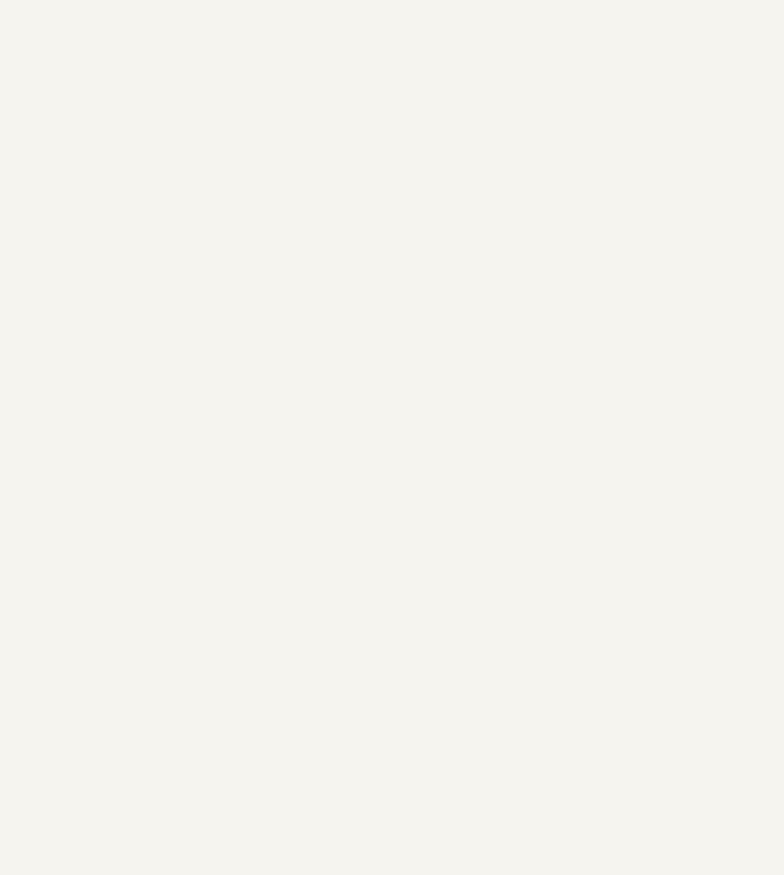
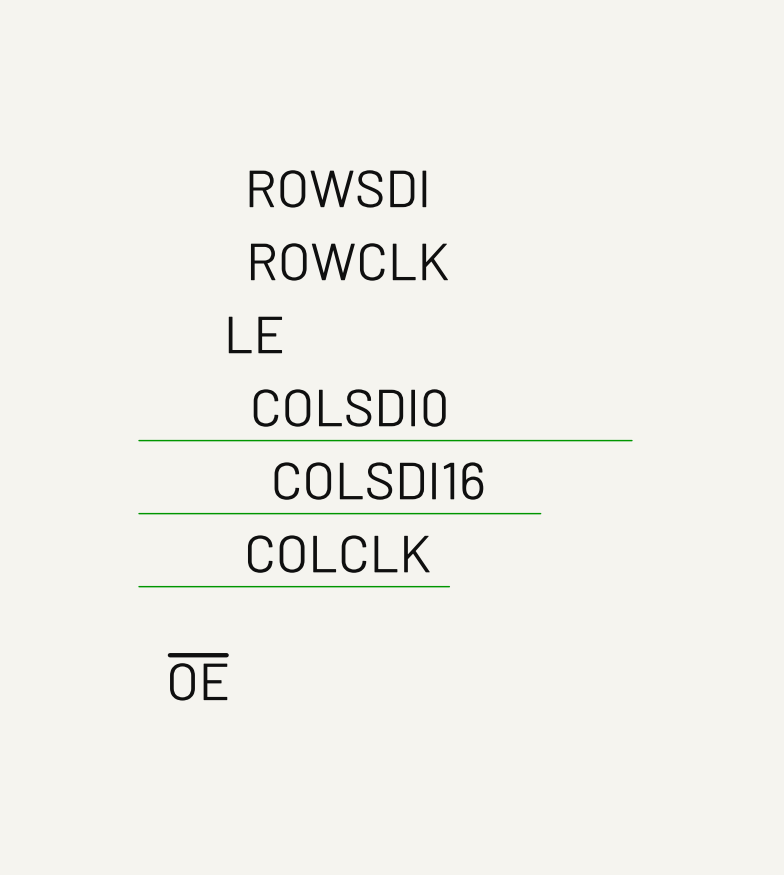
label: none -> ROWSDI (337, 188)
label: none -> ROWCLK (349, 261)
label: none -> LE (255, 334)
label: none -> COLSDI0 (349, 408)
wire: none -> (139, 440) (631, 440)
label: none -> COLSDI16 (378, 481)
wire: none -> (139, 513) (540, 513)
label: none -> COLCLK (338, 554)
wire: none -> (139, 586) (449, 586)
label: none -> ~{OE} (198, 677)

